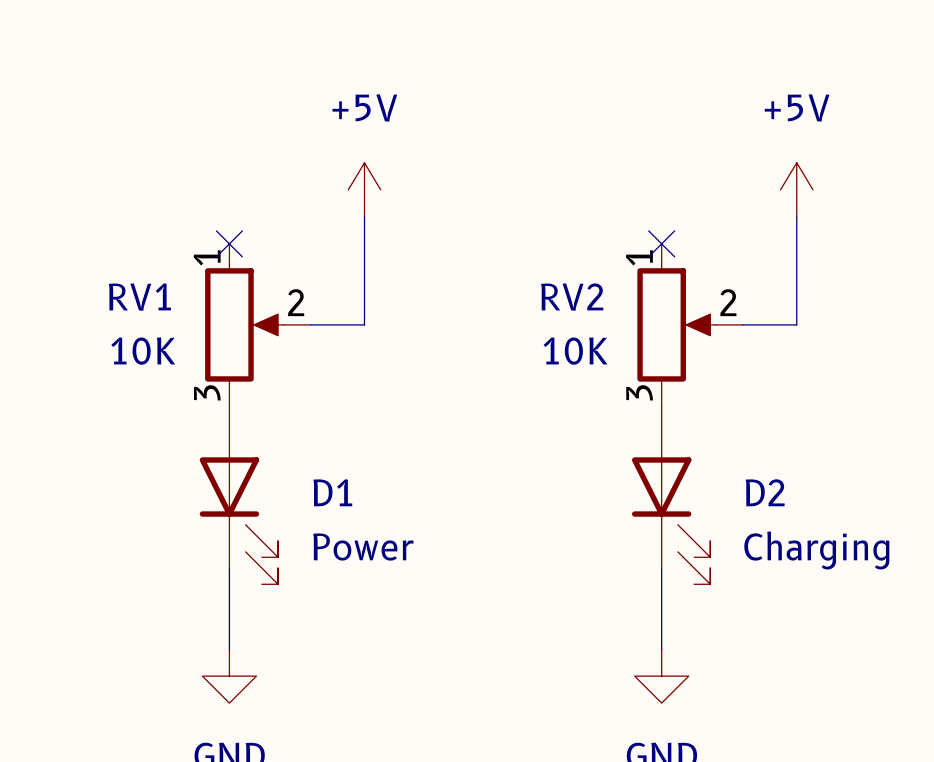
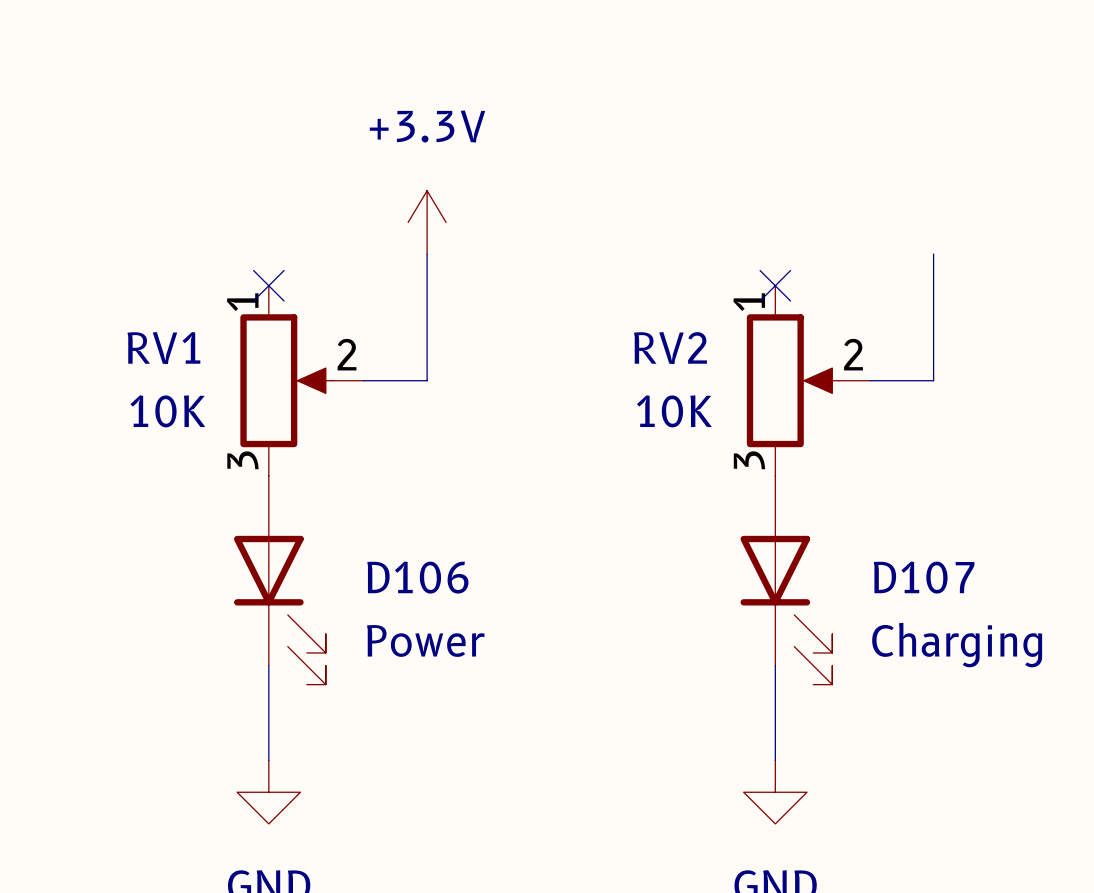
power symbol: +5V (364, 189) -> +3.3V (427, 222)
power symbol: +5V (796, 189) -> none
D1 name: D1 (332, 492) -> D106 (417, 577)
D2 name: D2 (765, 492) -> D107 (924, 577)

